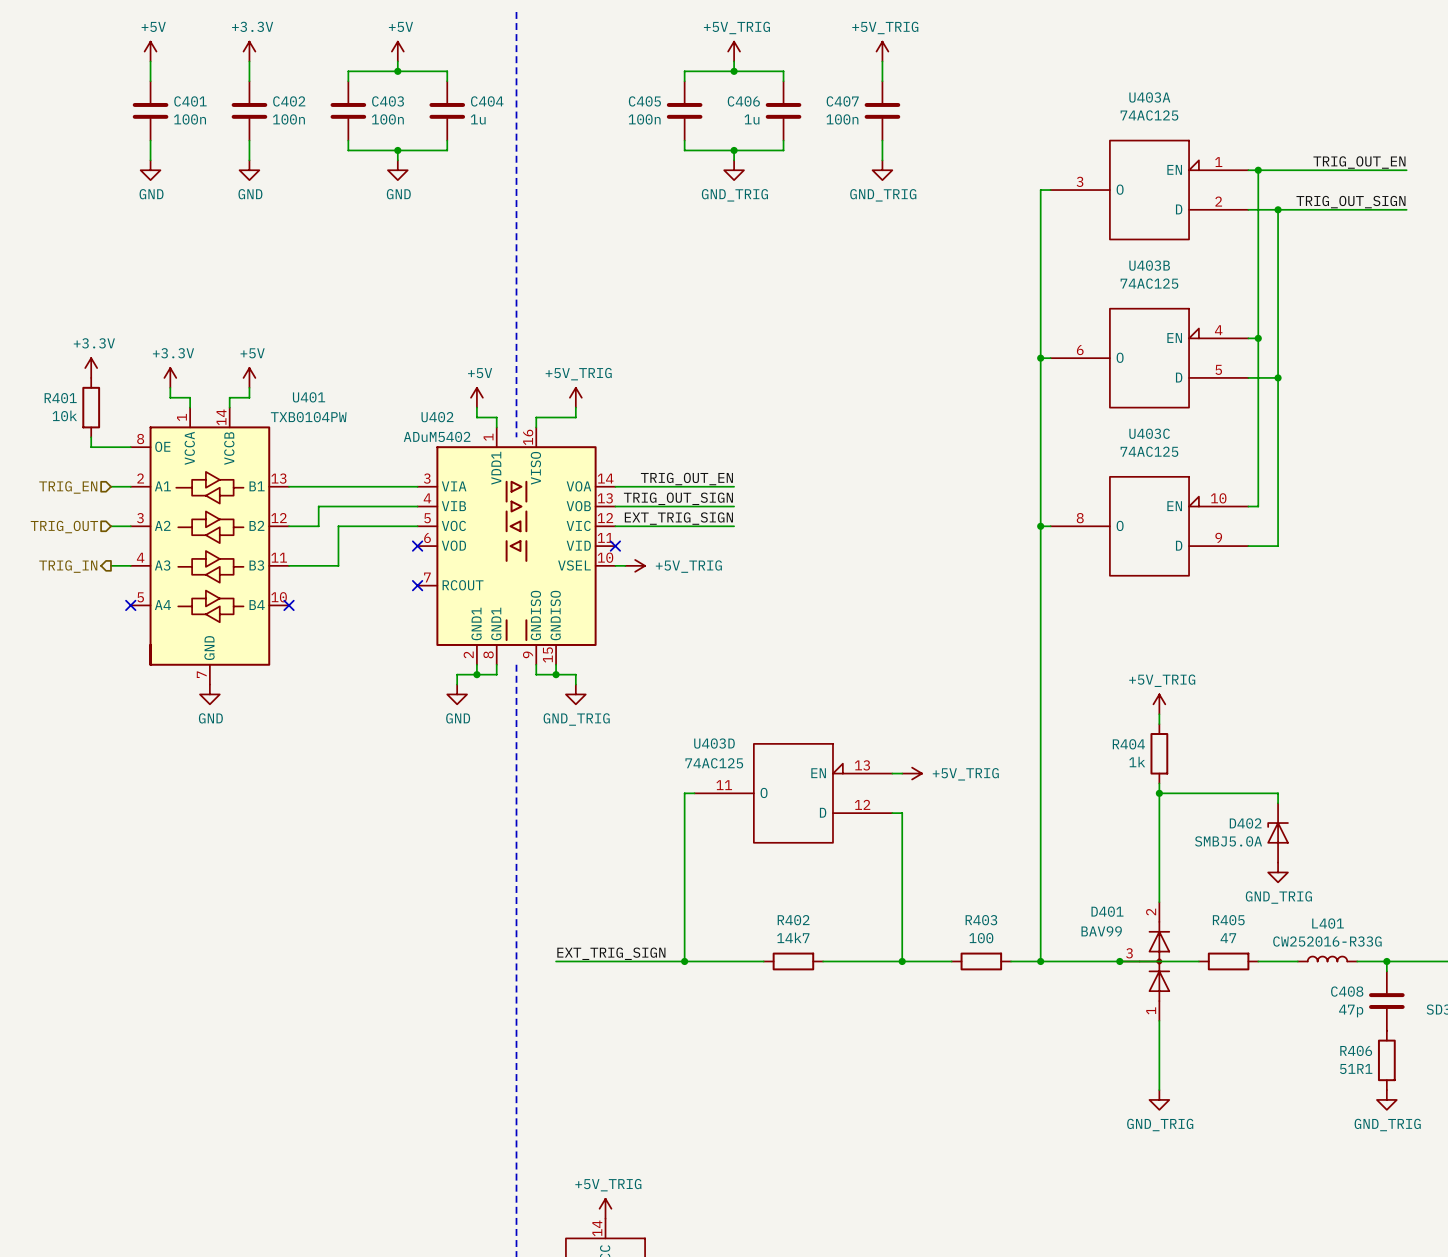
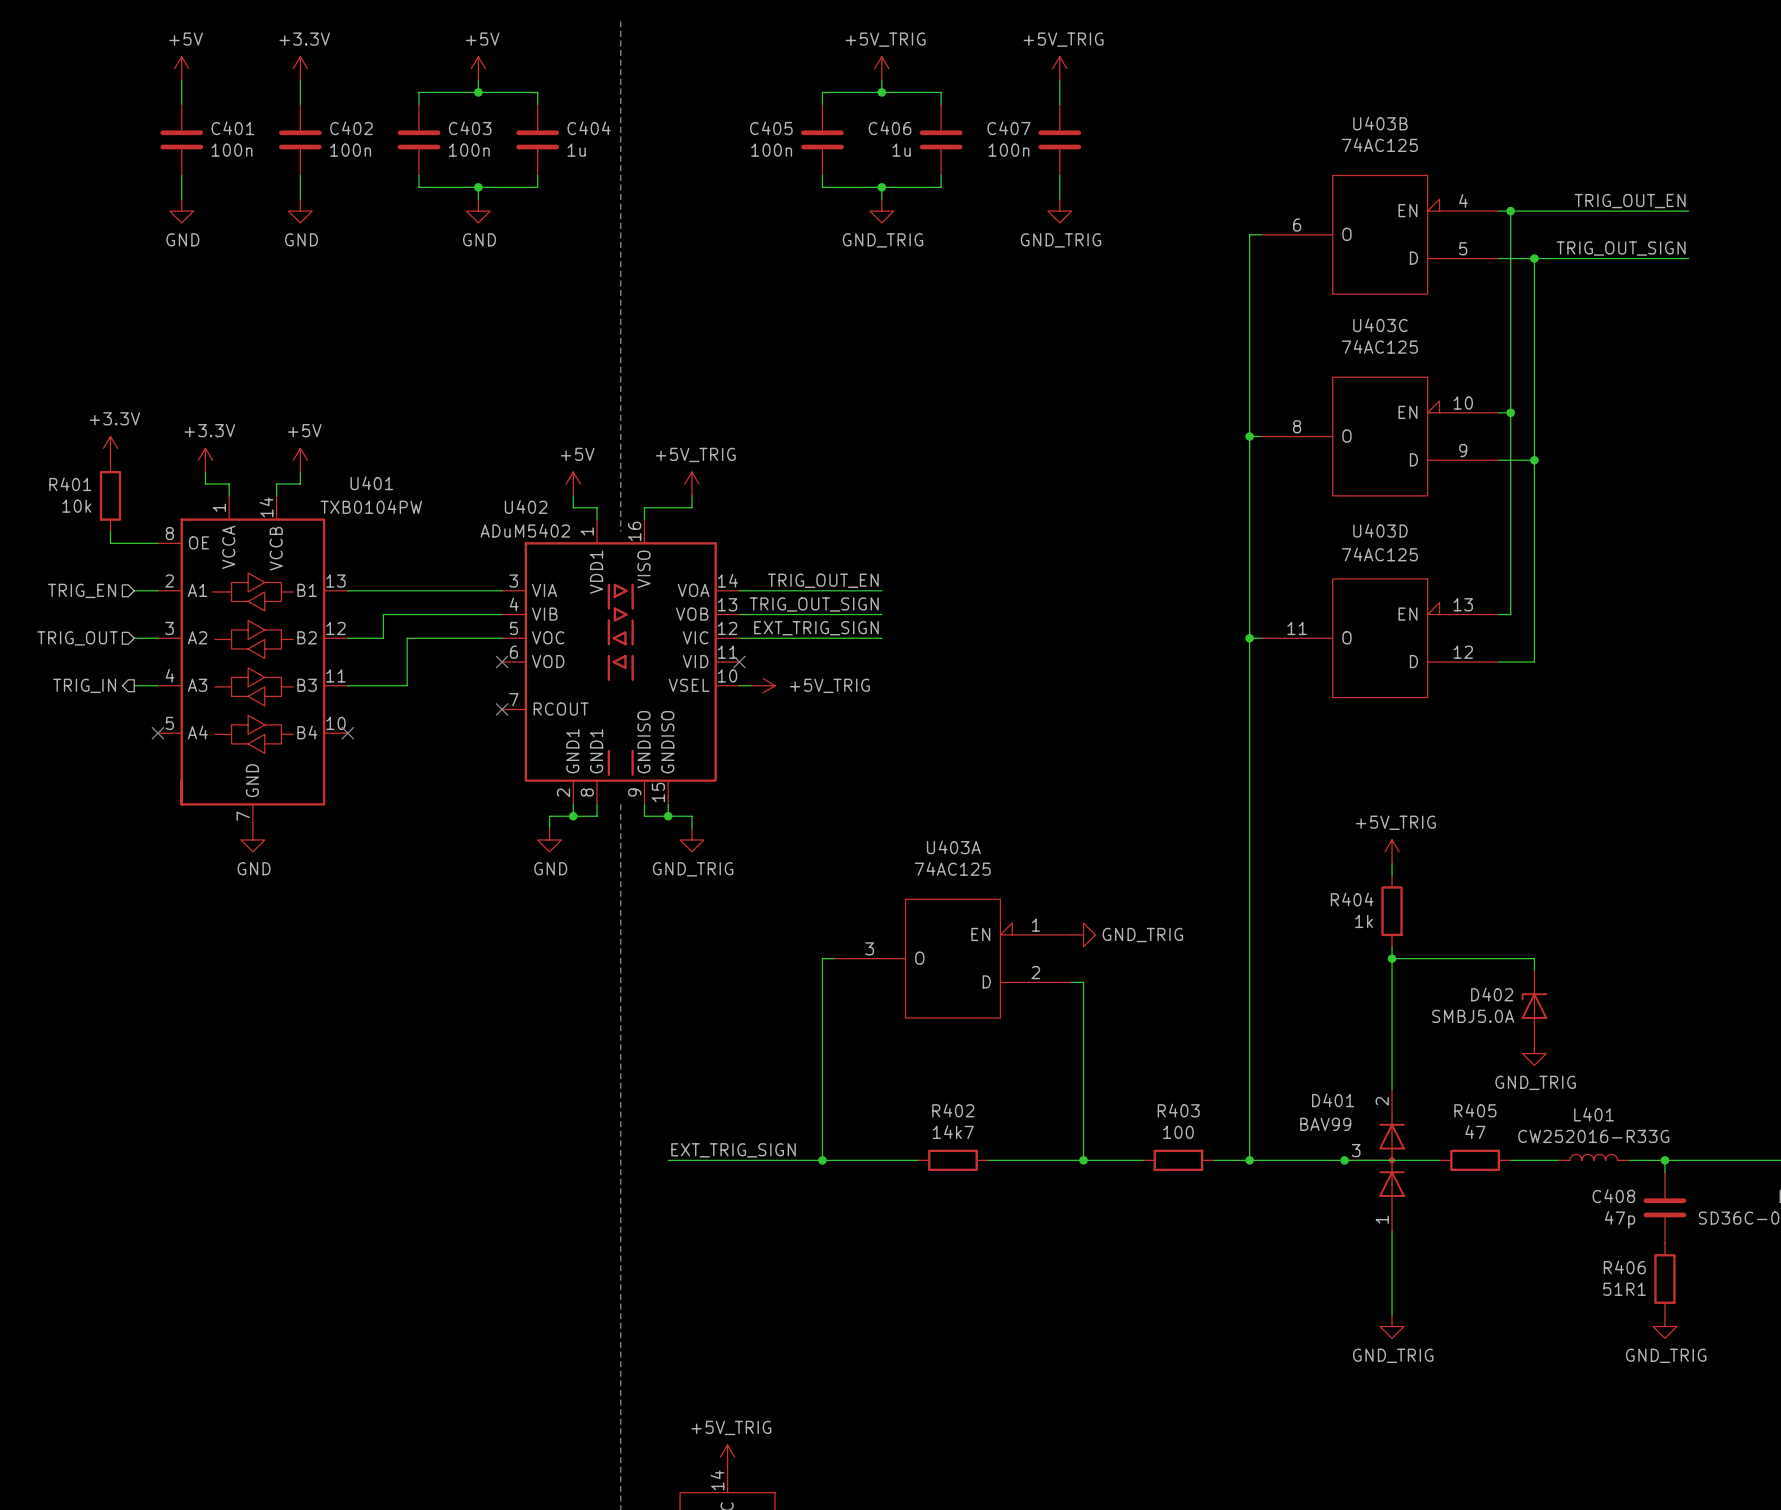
U403A position: (1149, 190) -> (952, 958)
U403B position: (1149, 358) -> (1380, 234)
U403C position: (1149, 526) -> (1380, 436)
U403D name position: U403D (714, 743) -> U403D (1380, 530)
U403D value position: 74AC125 (714, 763) -> 74AC125 (1379, 554)
power symbol: none -> GND_TRIG (1083, 934)
power symbol: +5V_TRIG (912, 773) -> none
U403D position: (793, 793) -> (1380, 638)

